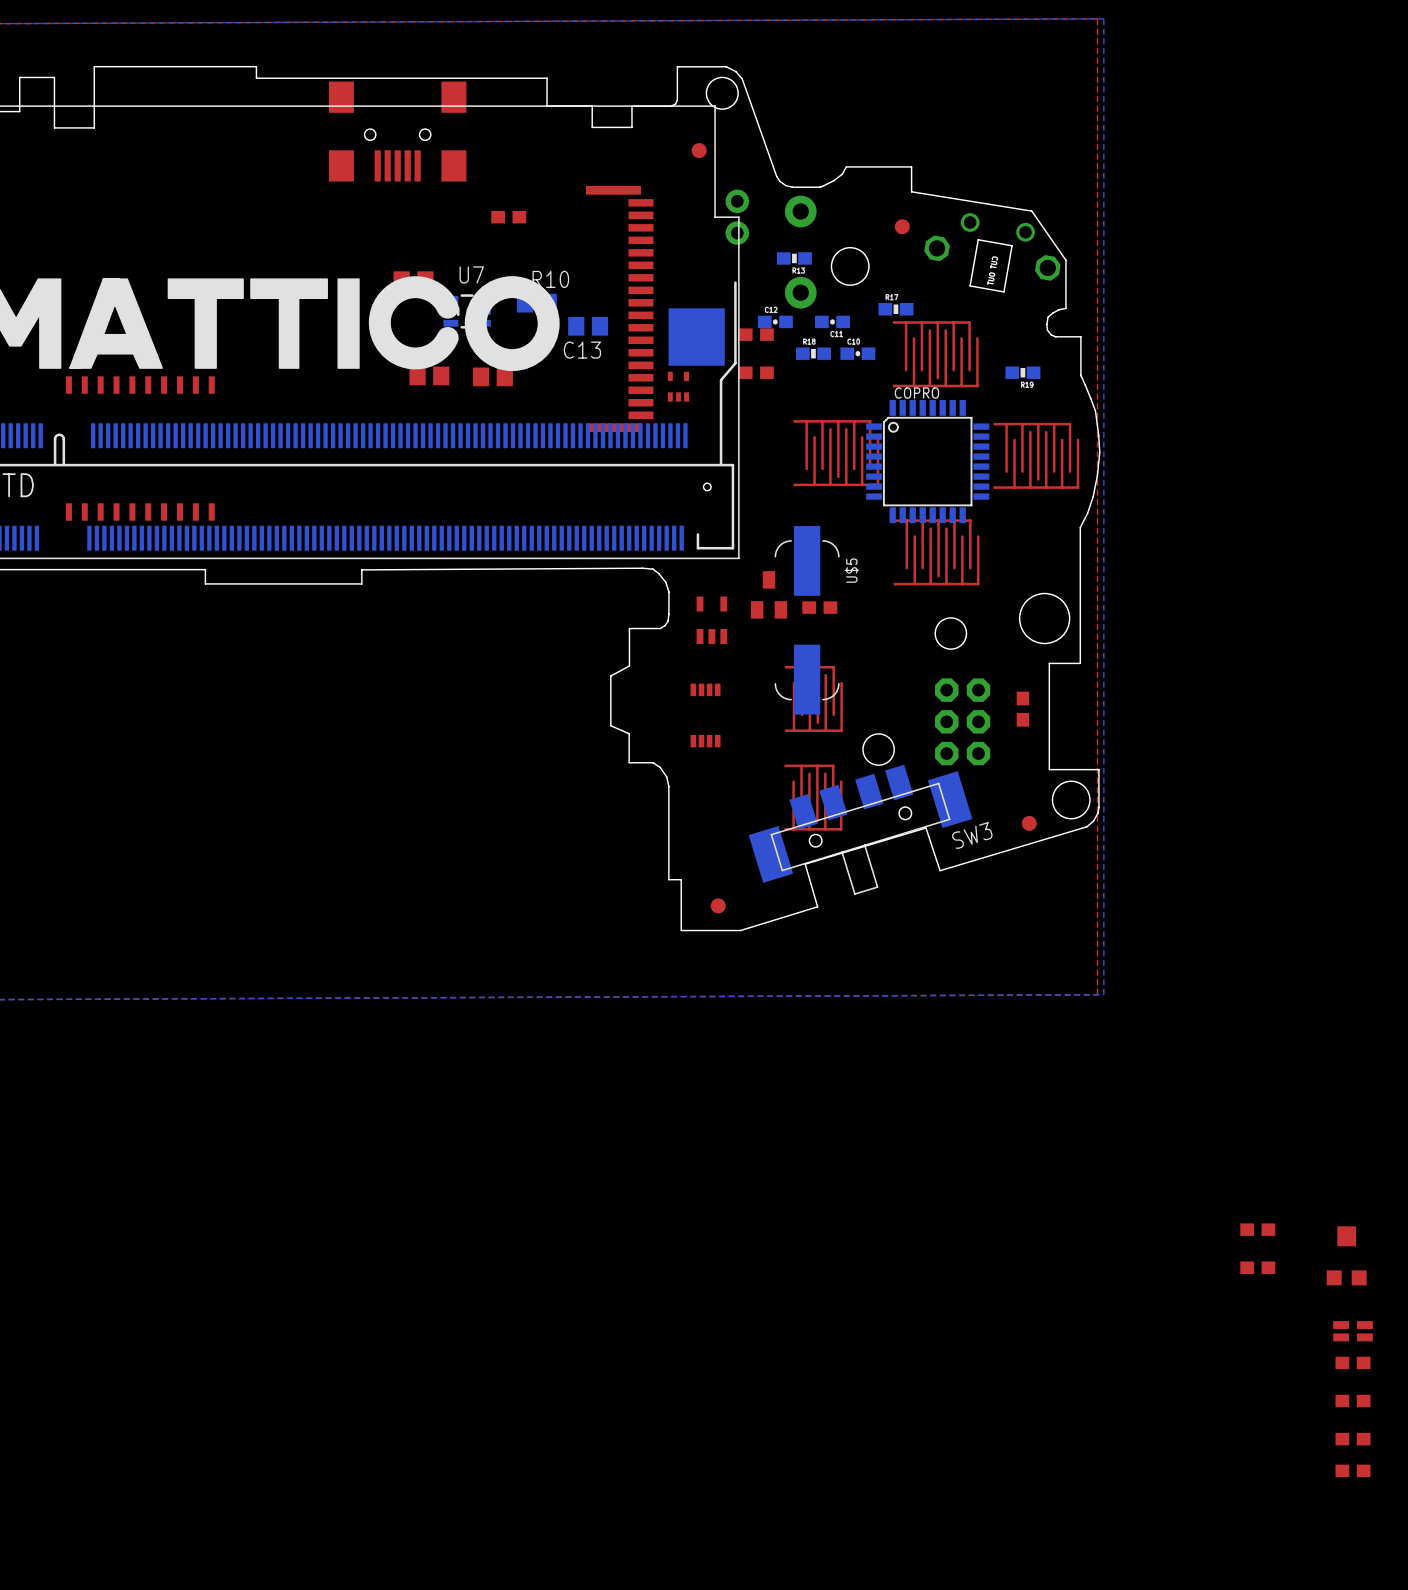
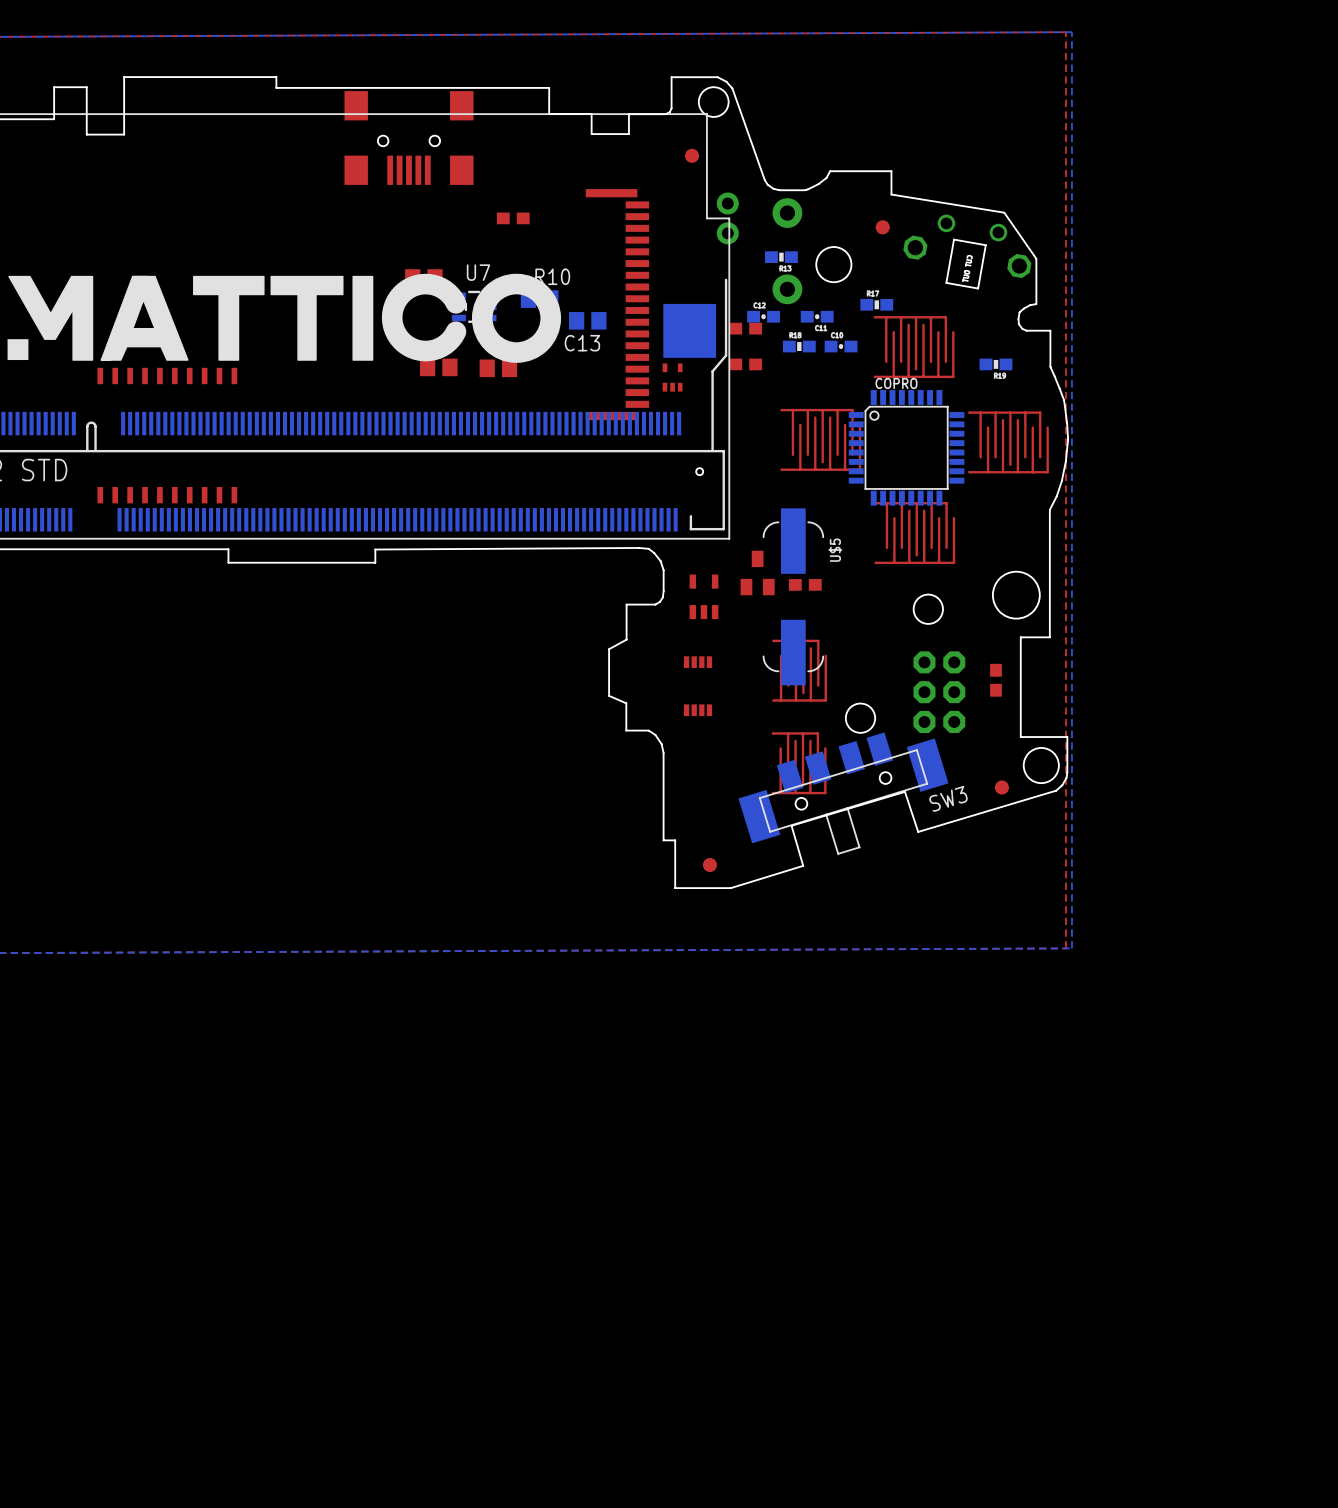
part: (1257, 1229) -> none
part: (1346, 1255) -> none
part: (1257, 1267) -> none
part: (1353, 1331) -> none
part: (1353, 1362) -> none
part: (1353, 1401) -> none
part: (1353, 1439) -> none
part: (1353, 1470) -> none

